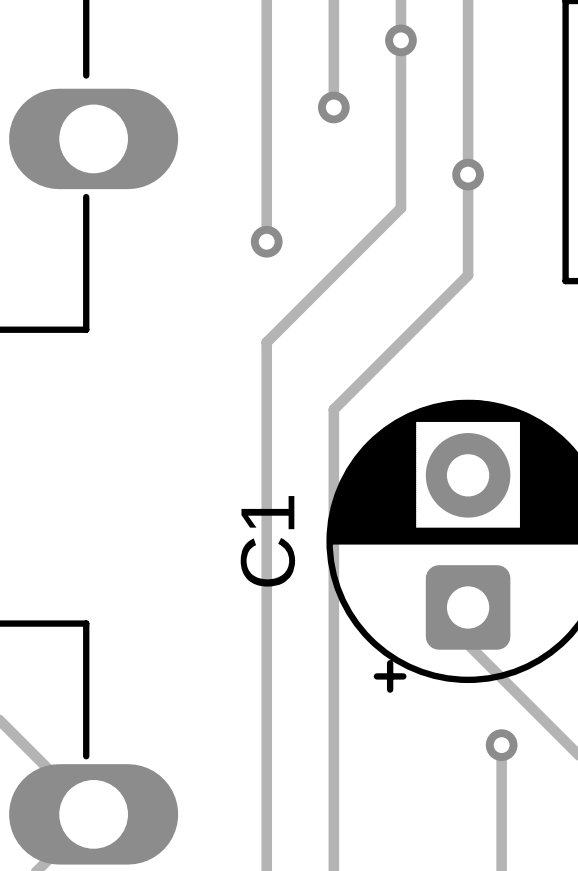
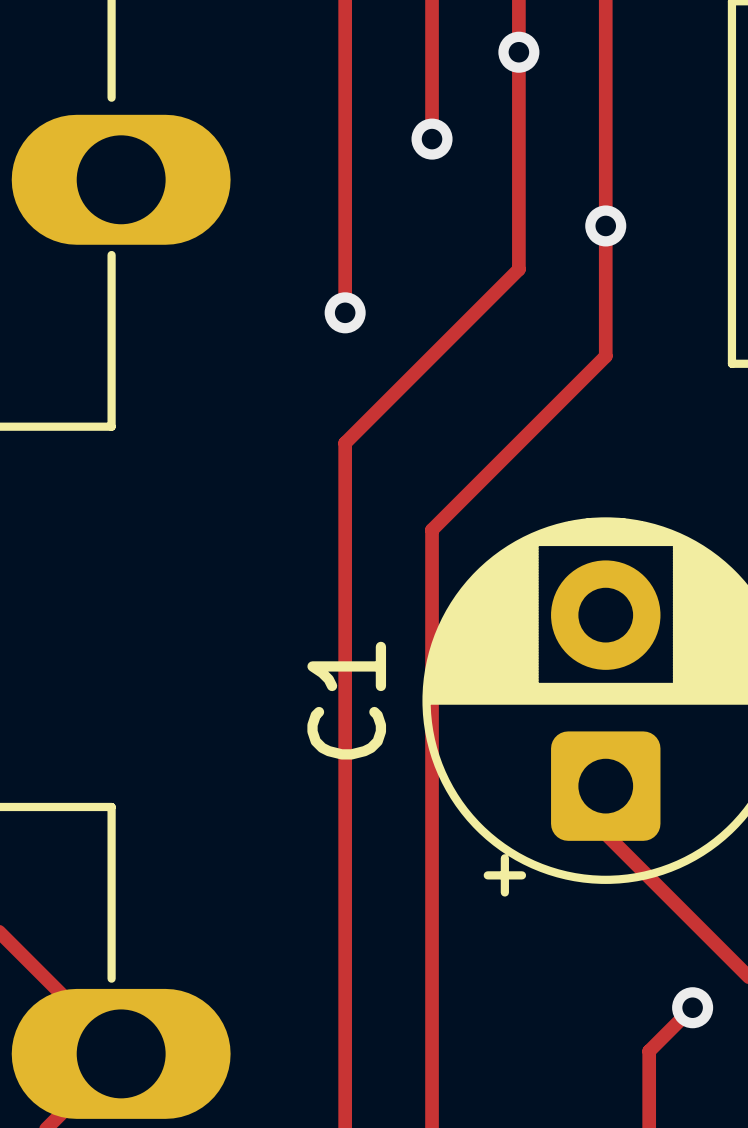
track: (501, 745) (501, 812) -> (692, 1007) (649, 1051)
via position: (501, 745) -> (692, 1007)

